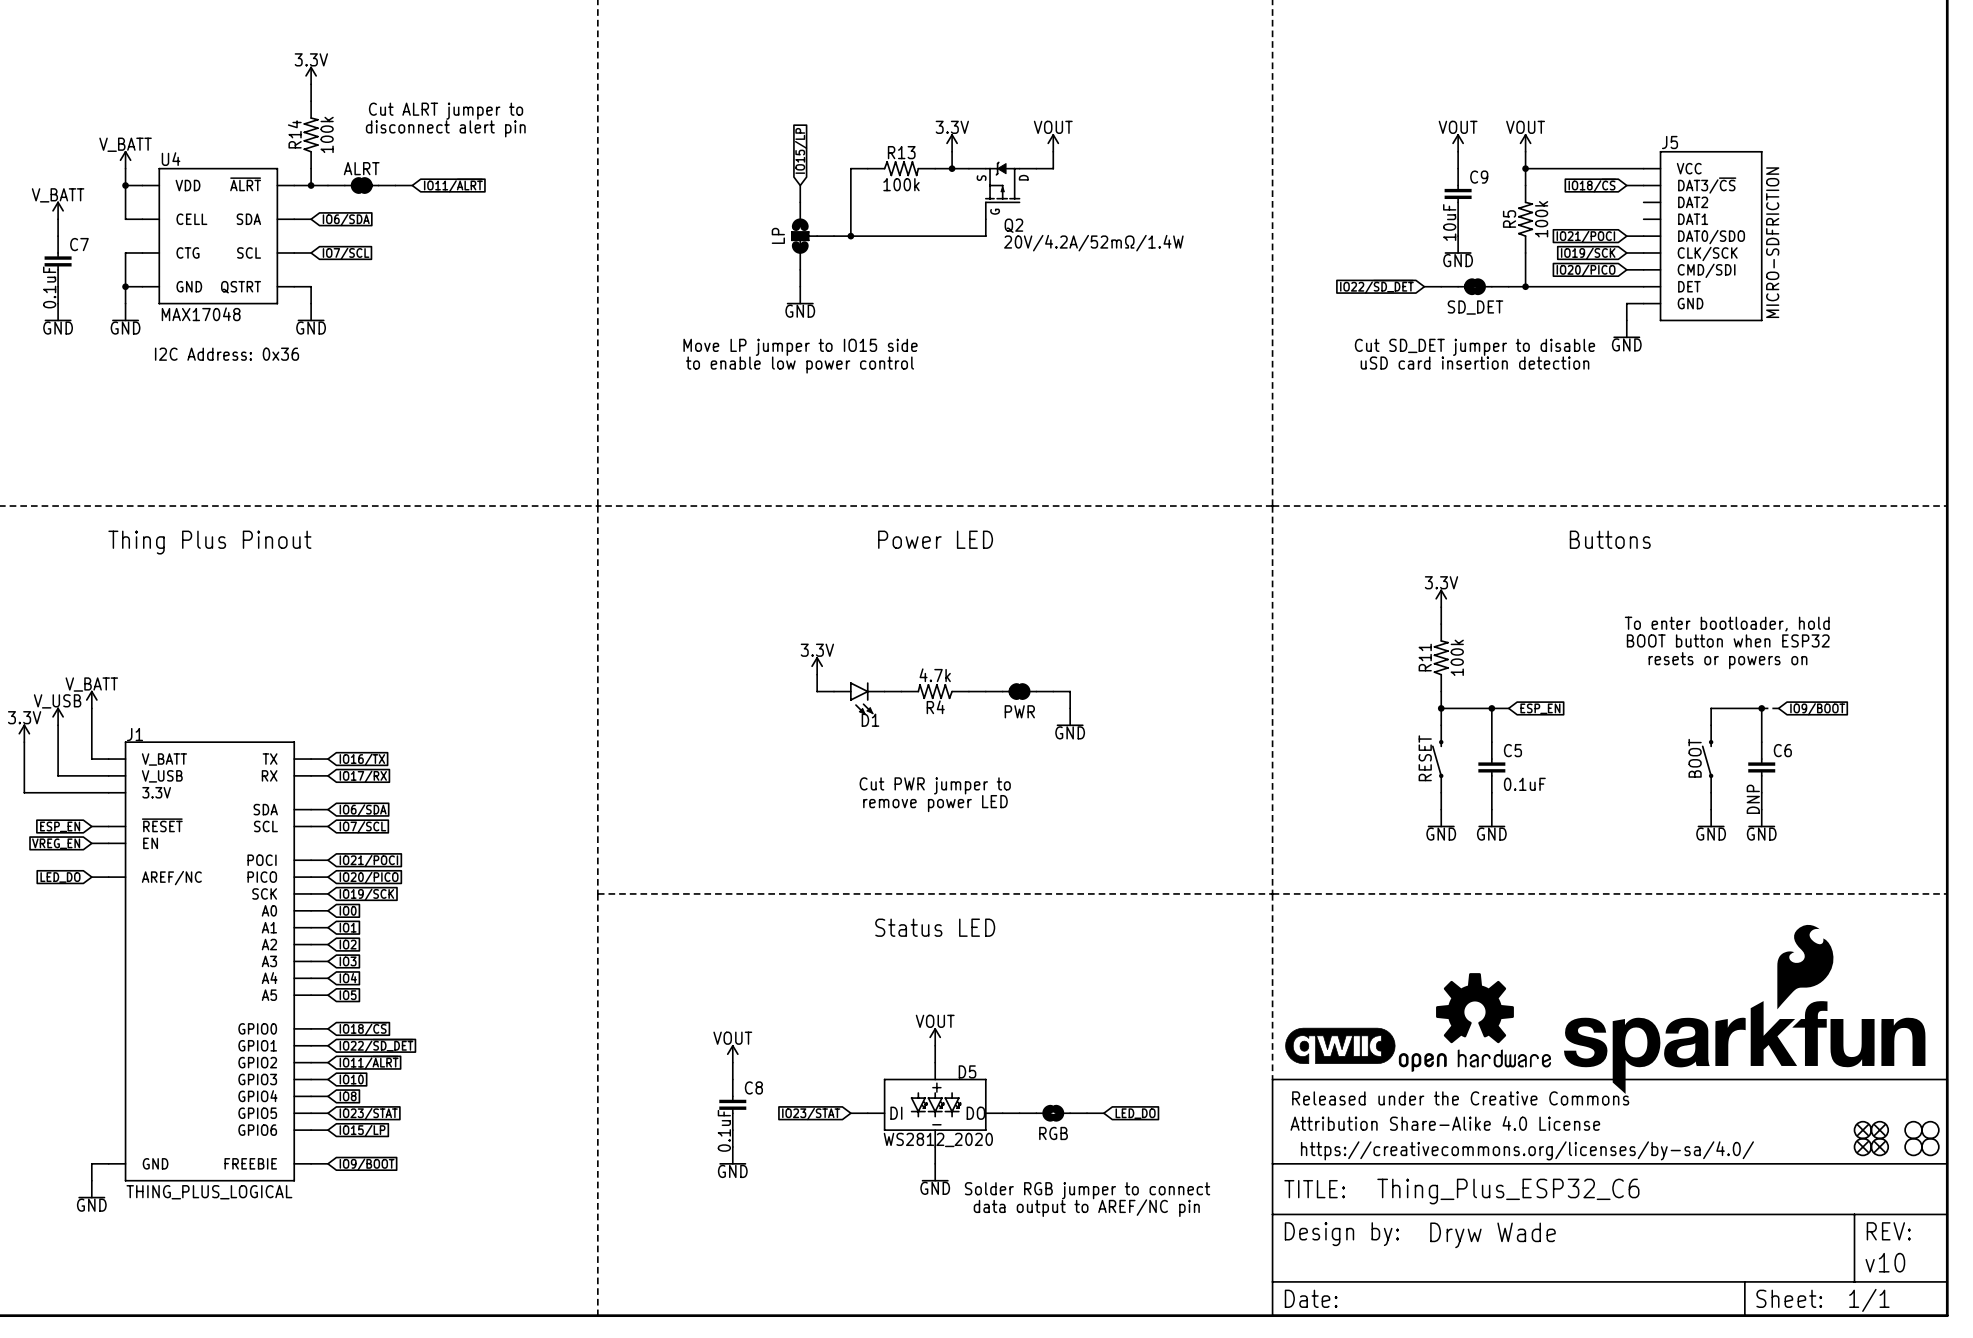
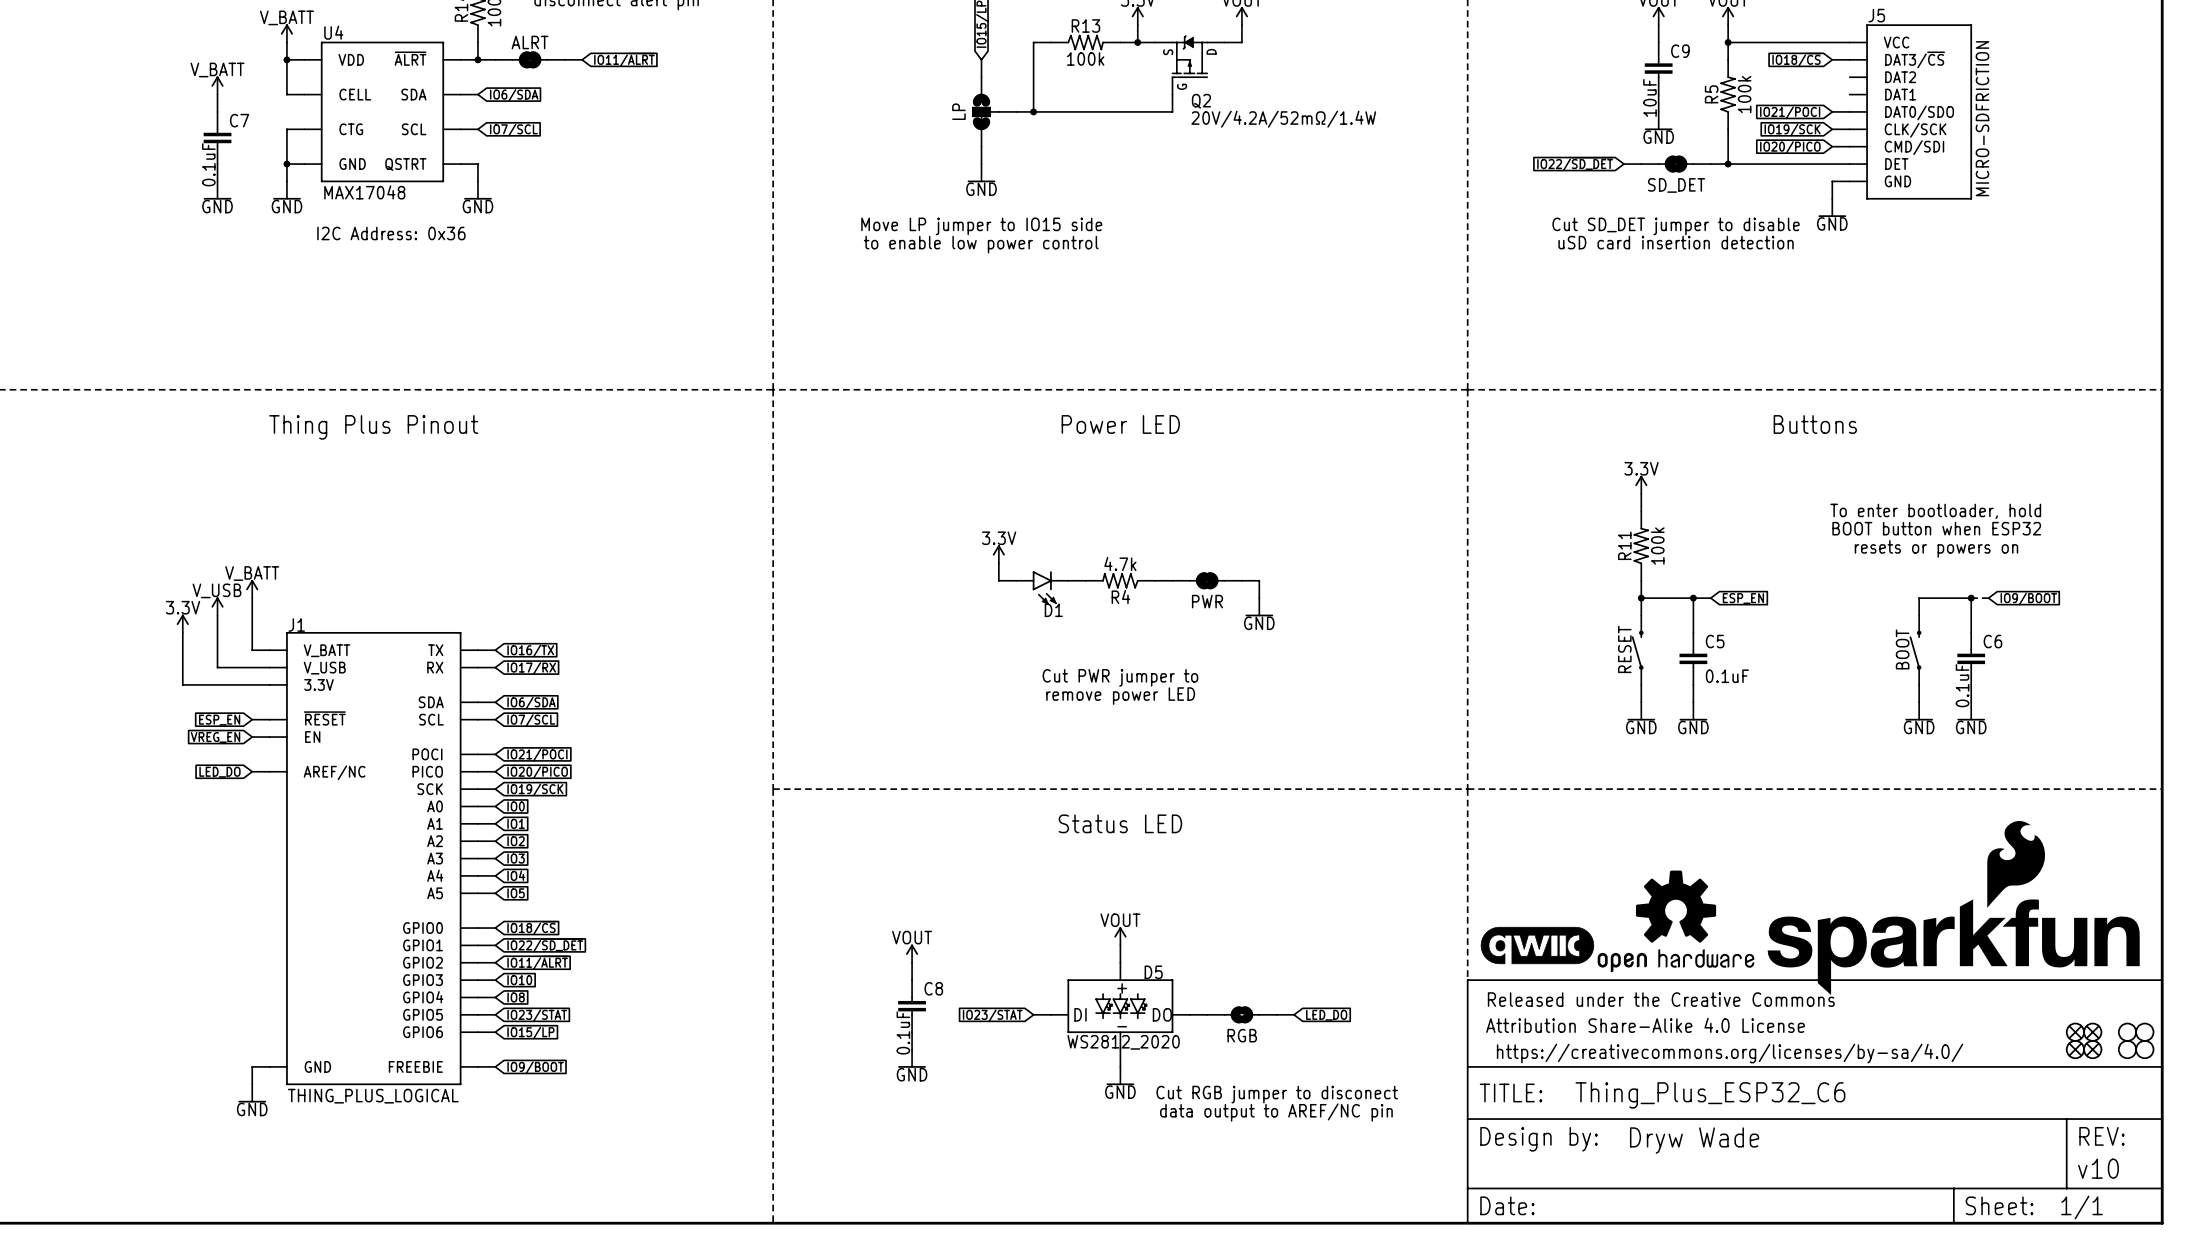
C6 value: DNP (1753, 799) -> 0.1uF (1962, 685)
text: Solder RGB jumper to connect (1087, 1190) -> Cut RGB jumper to disconect (1277, 1094)

